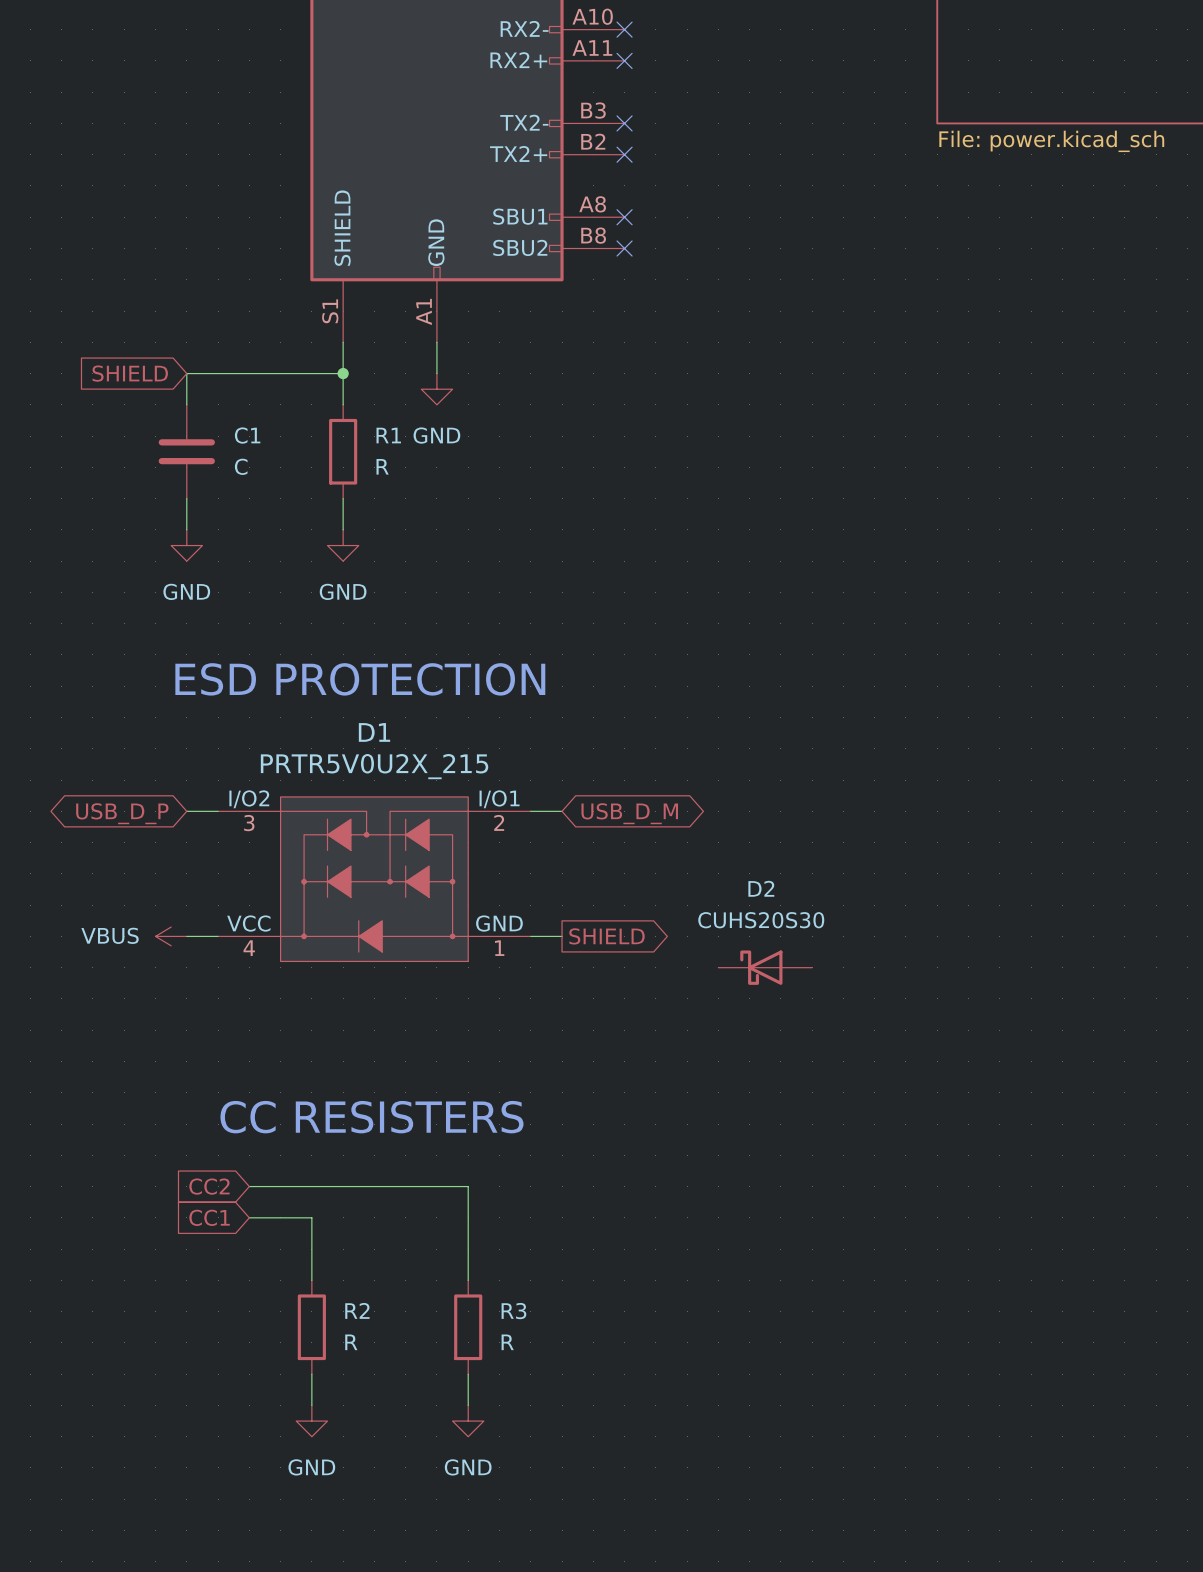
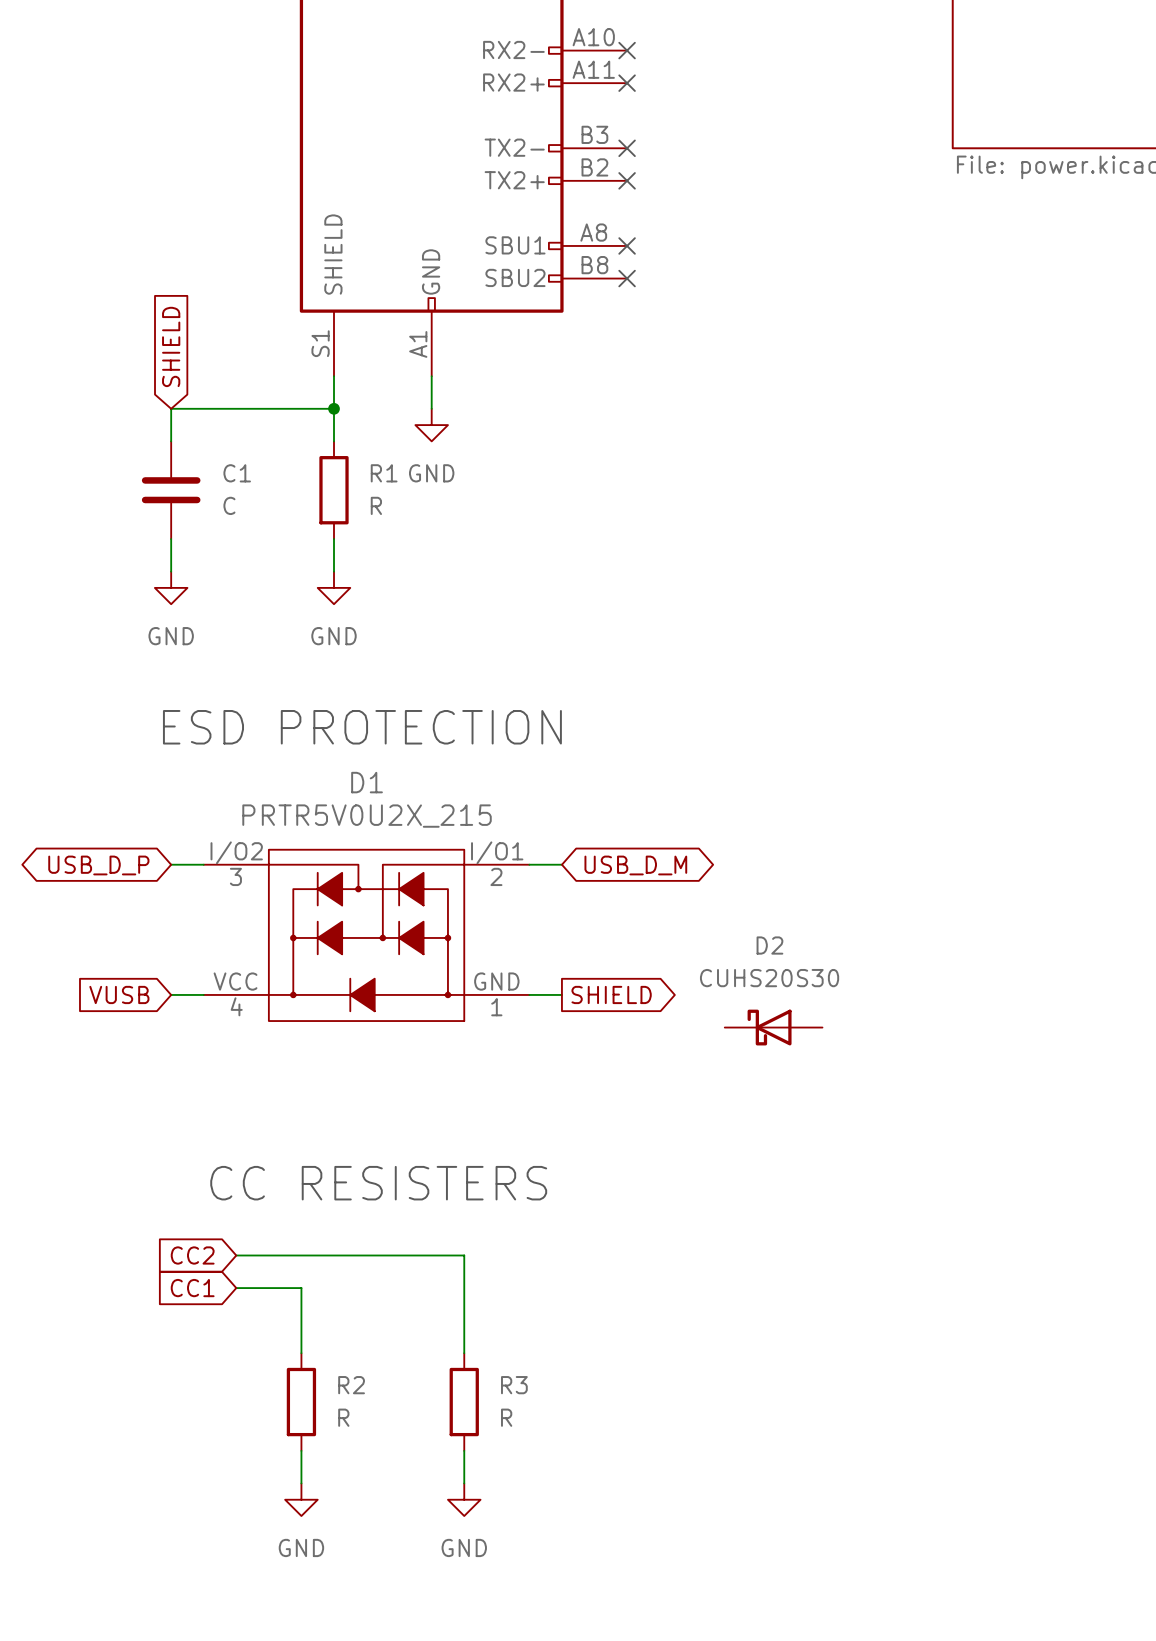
global label rotation: 0° (130, 373) -> 90° clockwise (171, 346)
global label: none -> VUSB (119, 994)
power symbol: VBUS (171, 936) -> none

